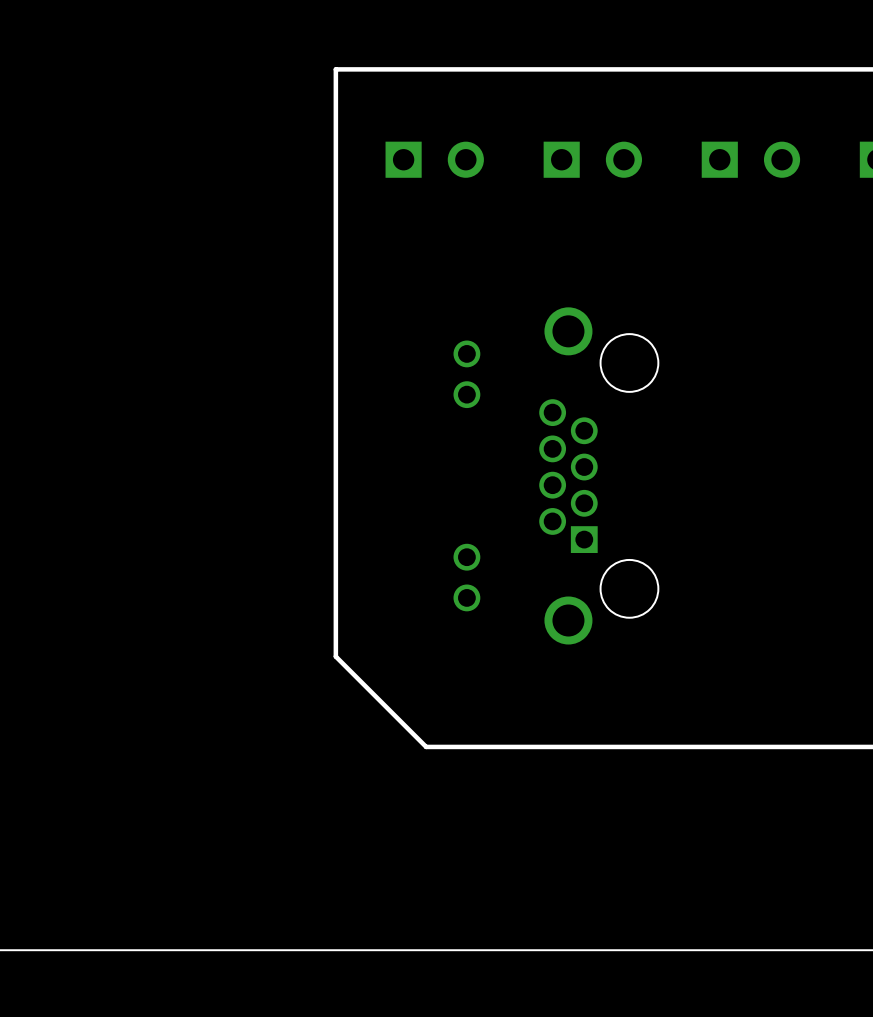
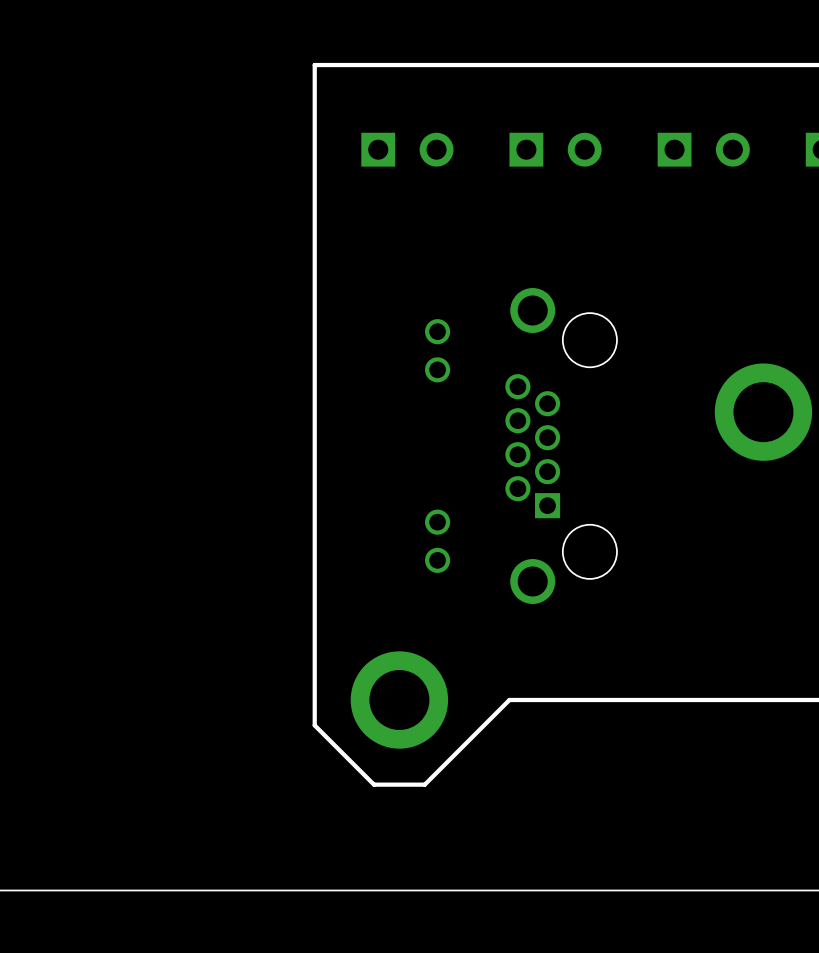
part: none -> (763, 412)
board edge: (335, 656) (426, 746) (543, 746) -> (314, 615) (314, 725) (374, 784) (424, 784) (509, 700)
part: none -> (399, 700)

